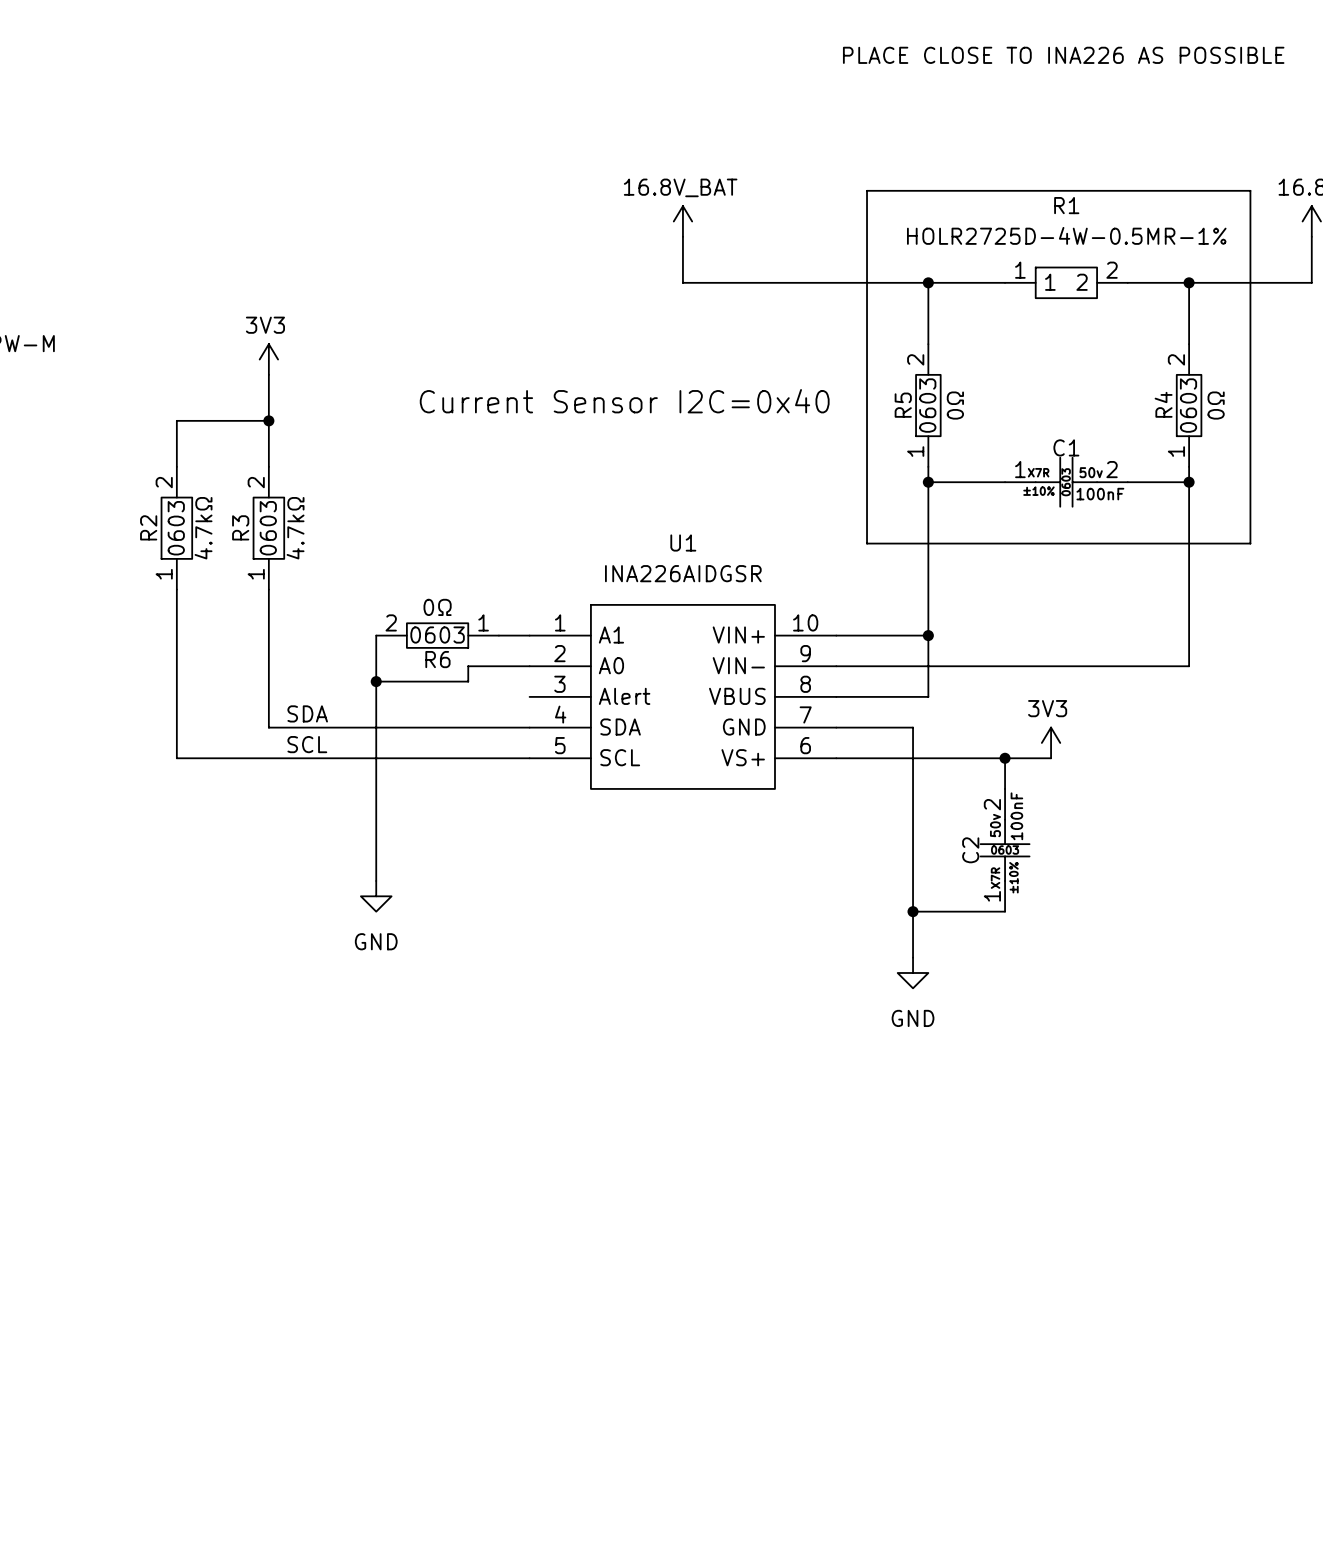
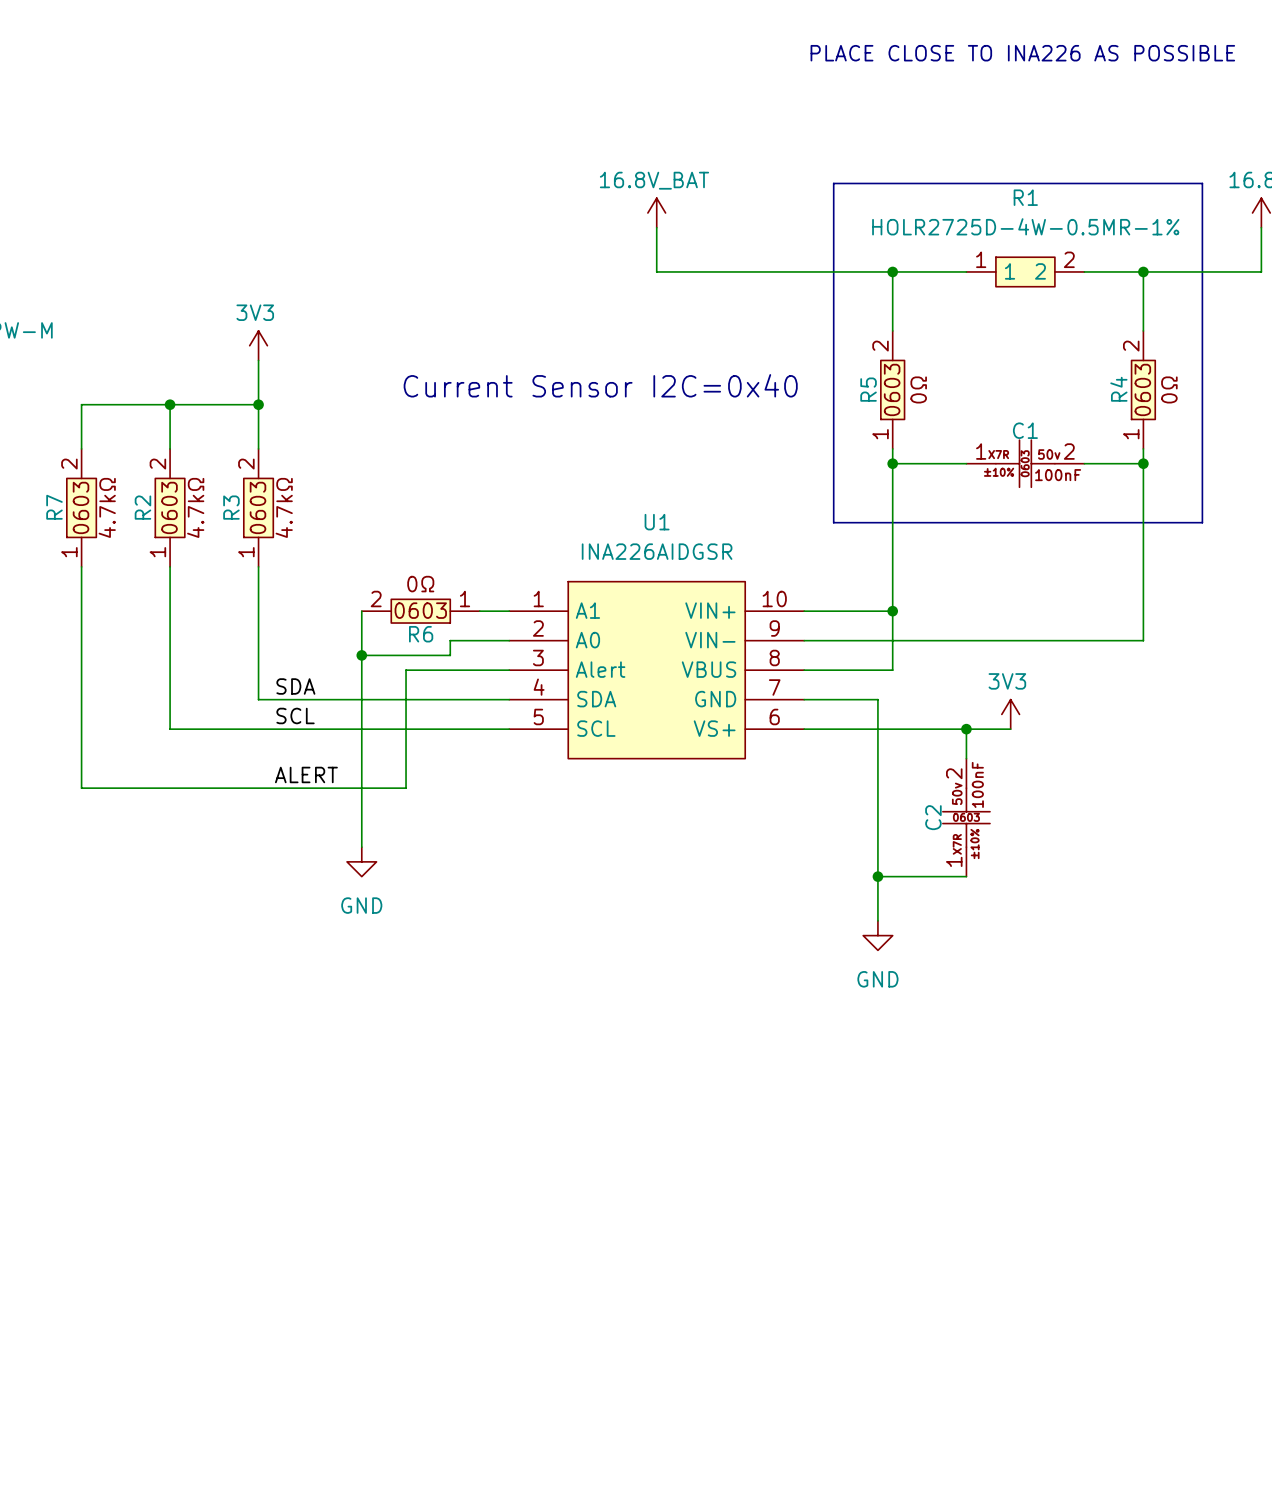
wire: none -> (170, 404) (81, 404) (81, 448)
junction: none -> (170, 404)
R7: none -> (81, 507)
wire: none -> (81, 566) (81, 788) (406, 788) (406, 670) (509, 670)
label: none -> ALERT (306, 774)

